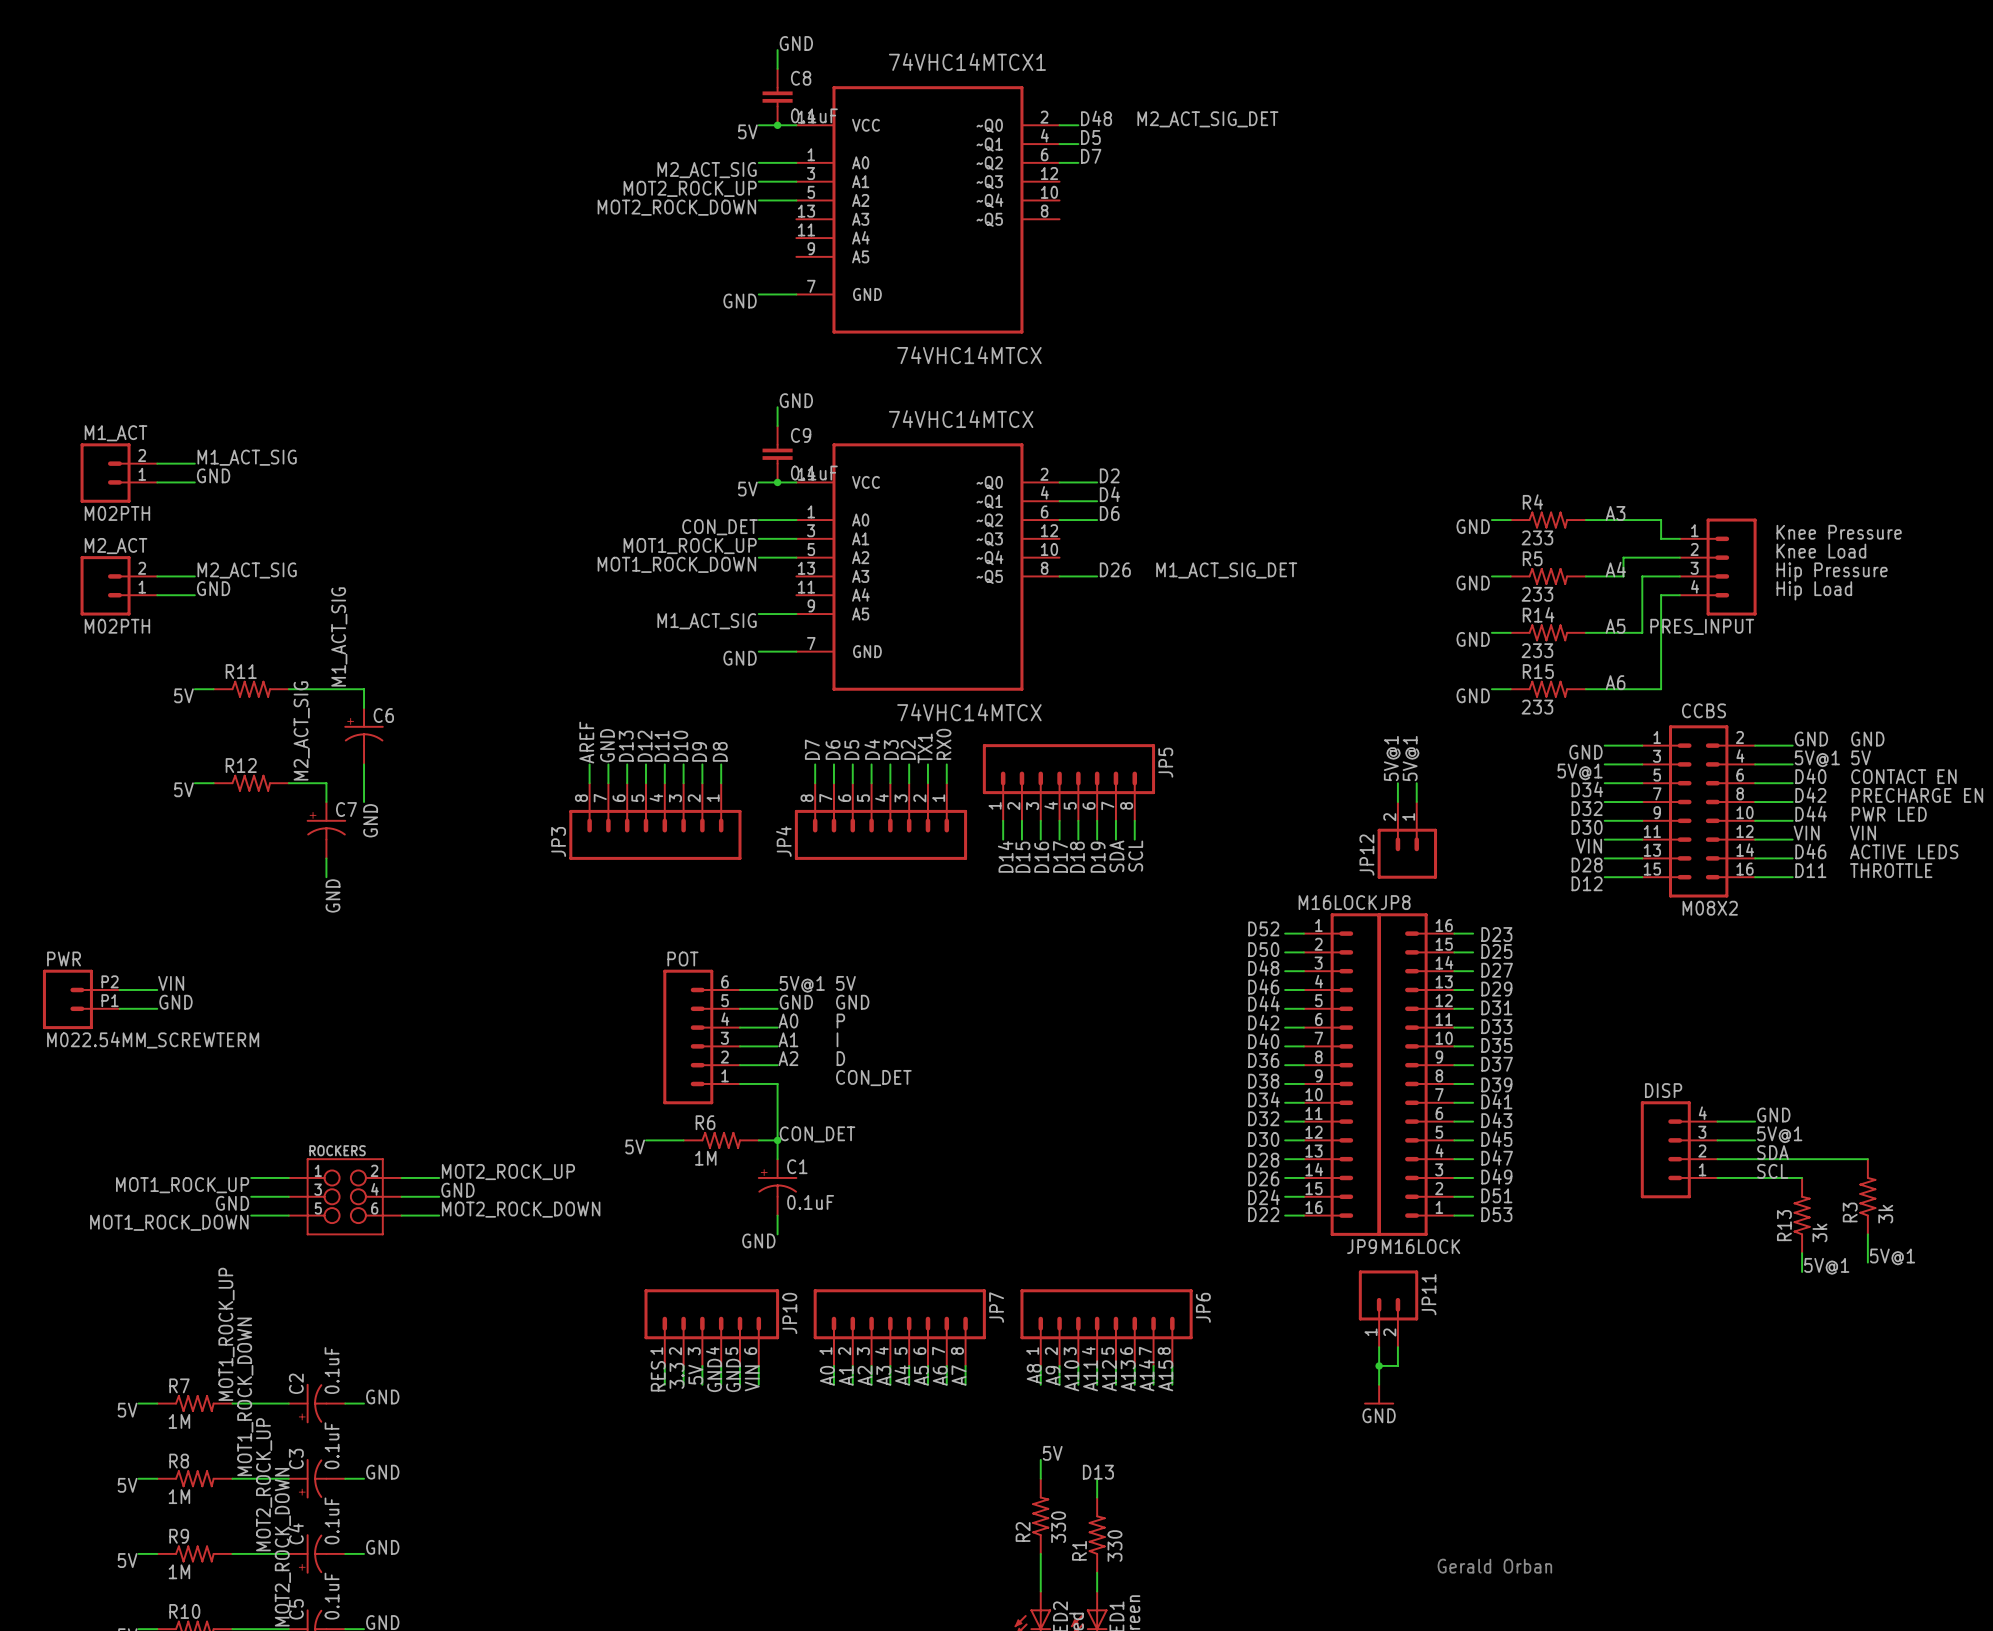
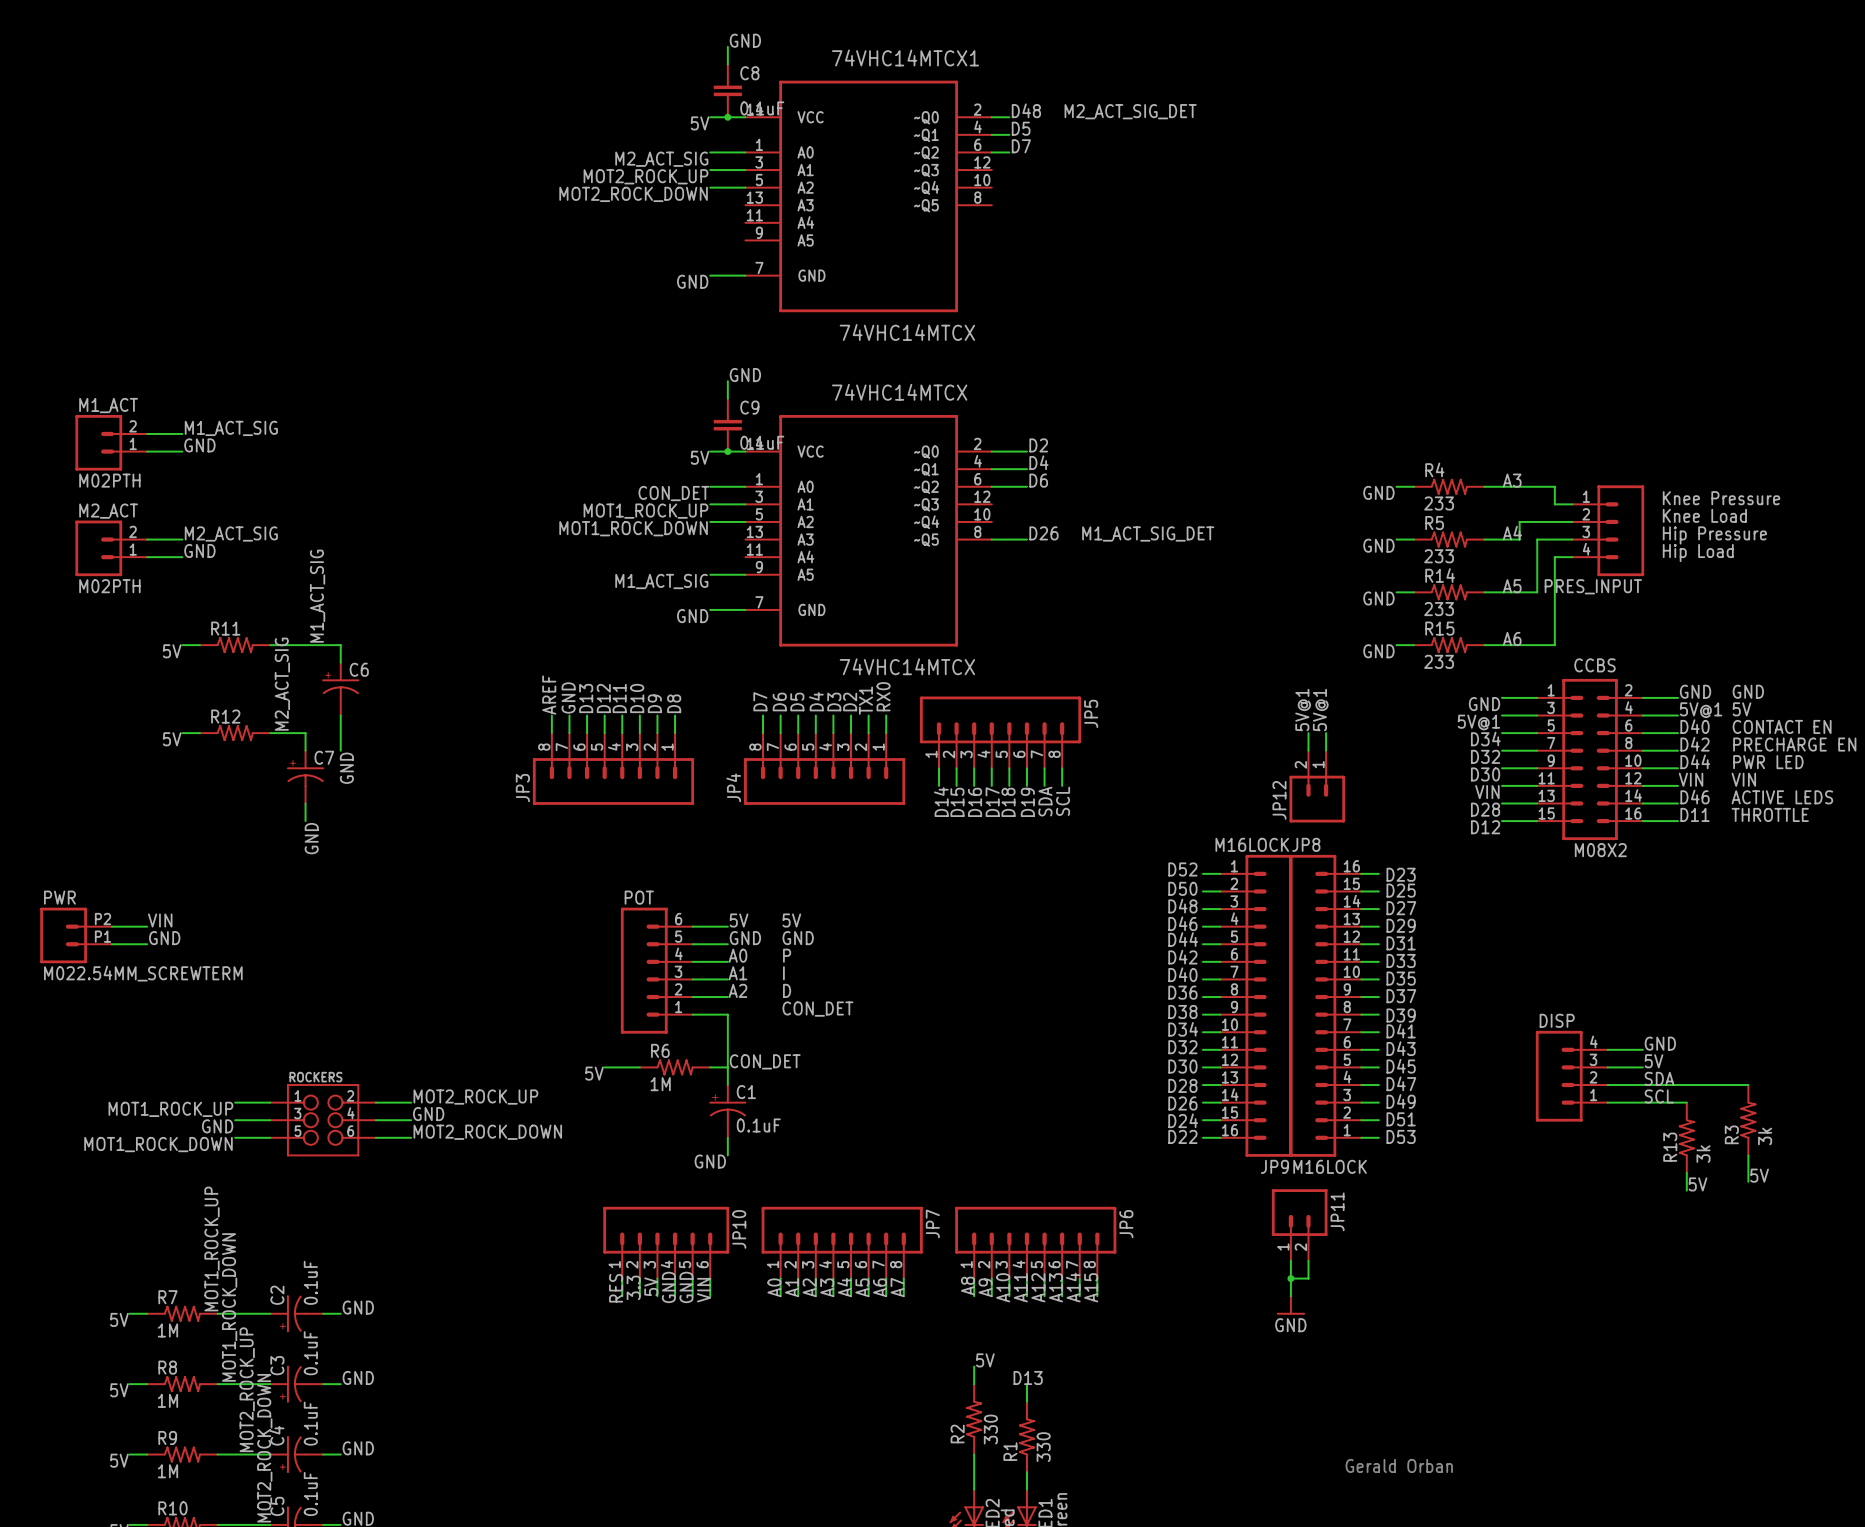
label: 5V@1 (802, 984) -> 5V (739, 920)
label: 5V@1 (1779, 1134) -> 5V (1654, 1061)
junction: (777, 1140) -> none
label: 5V@1 (1892, 1256) -> 5V (1759, 1175)
label: 5V@1 (1826, 1266) -> 5V (1698, 1184)

